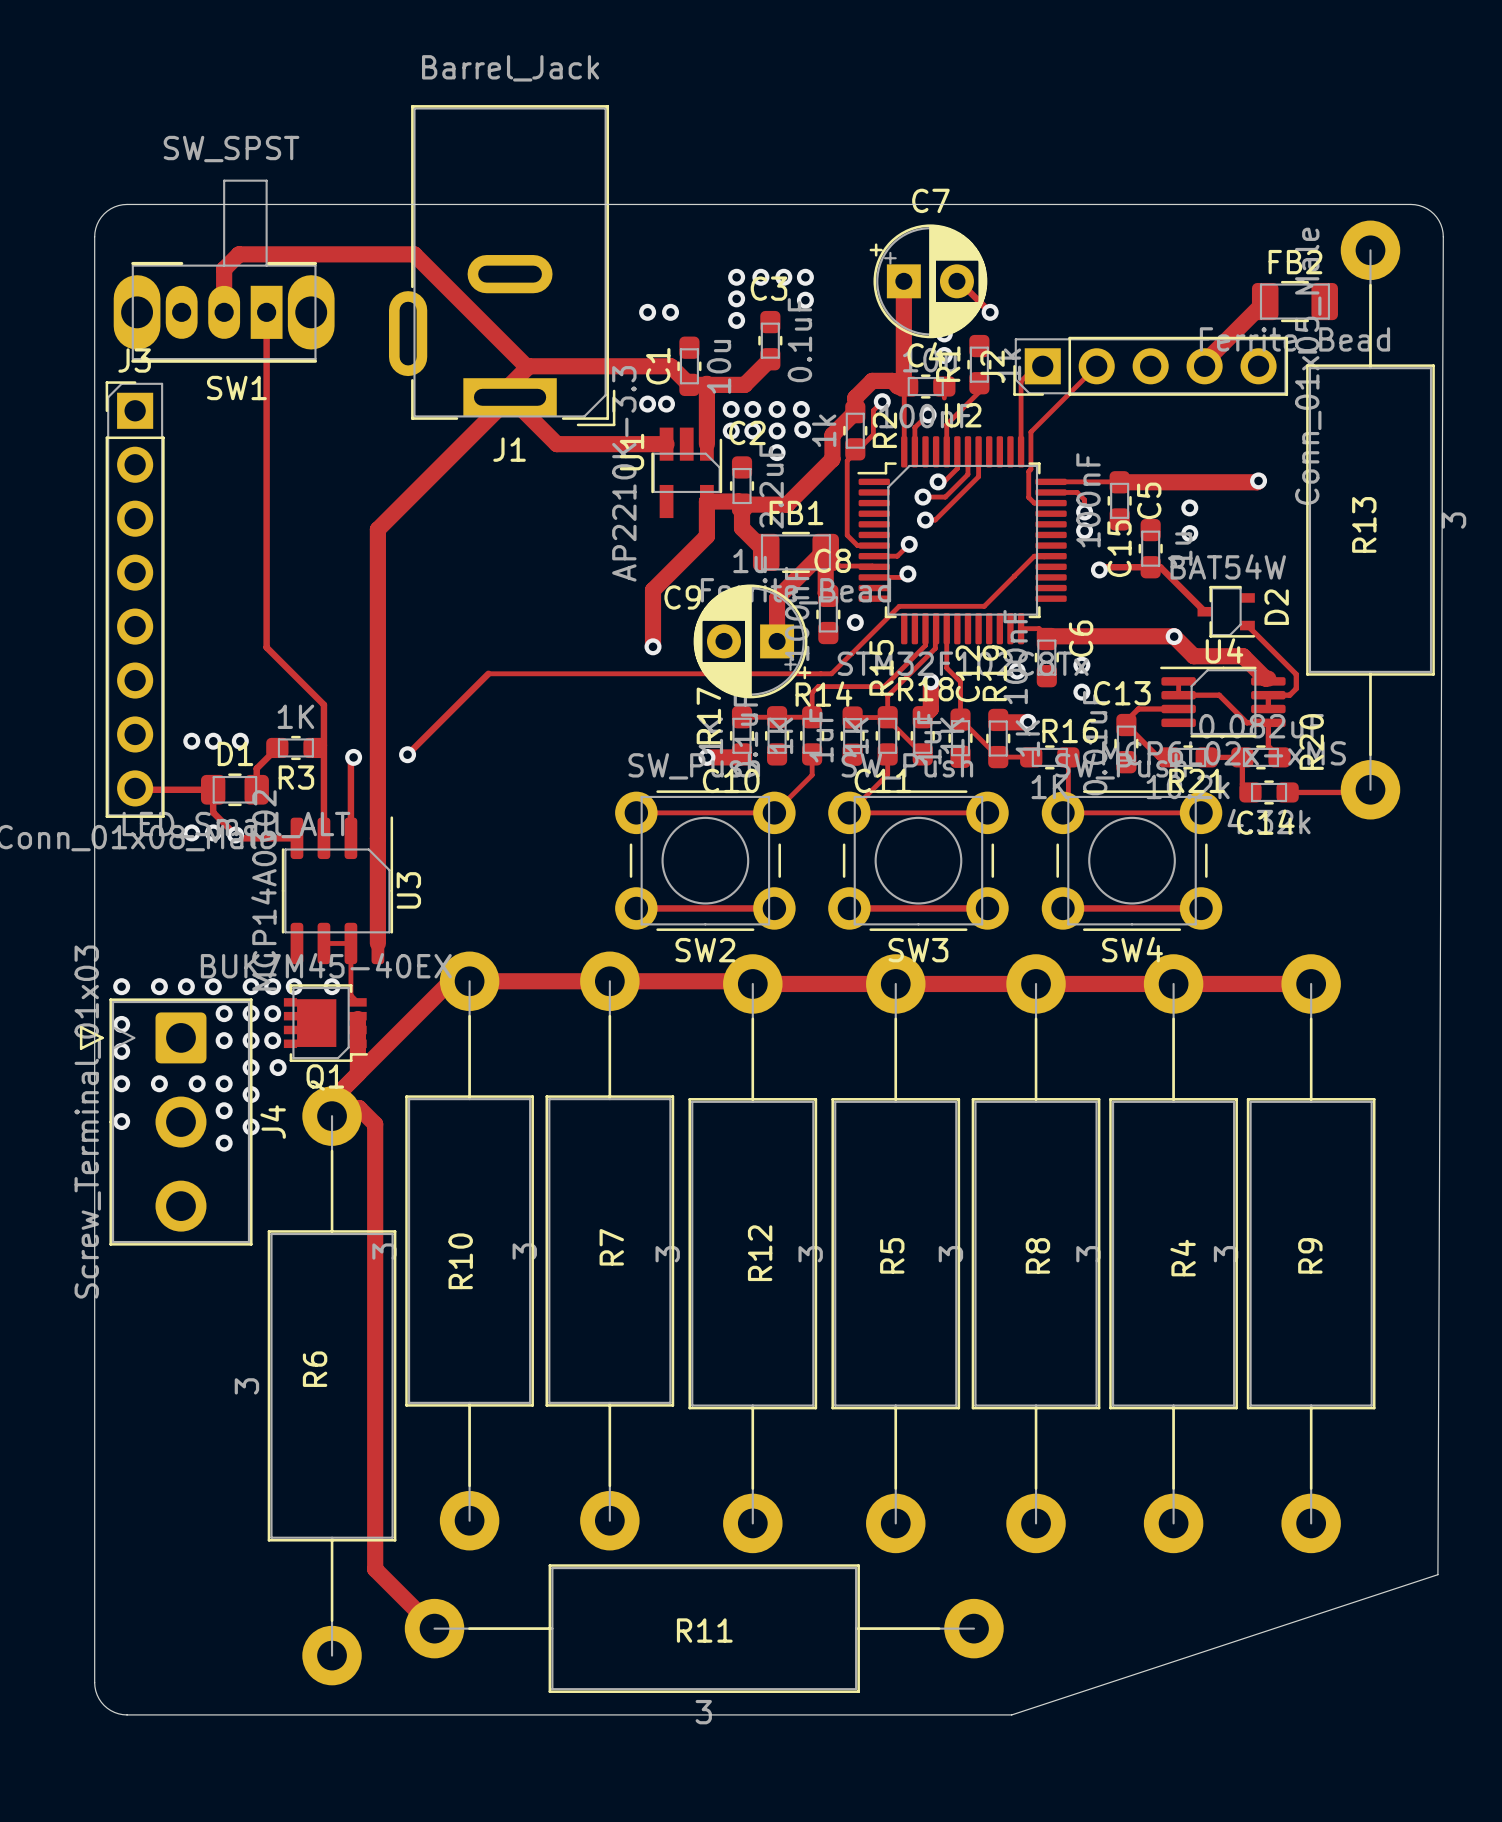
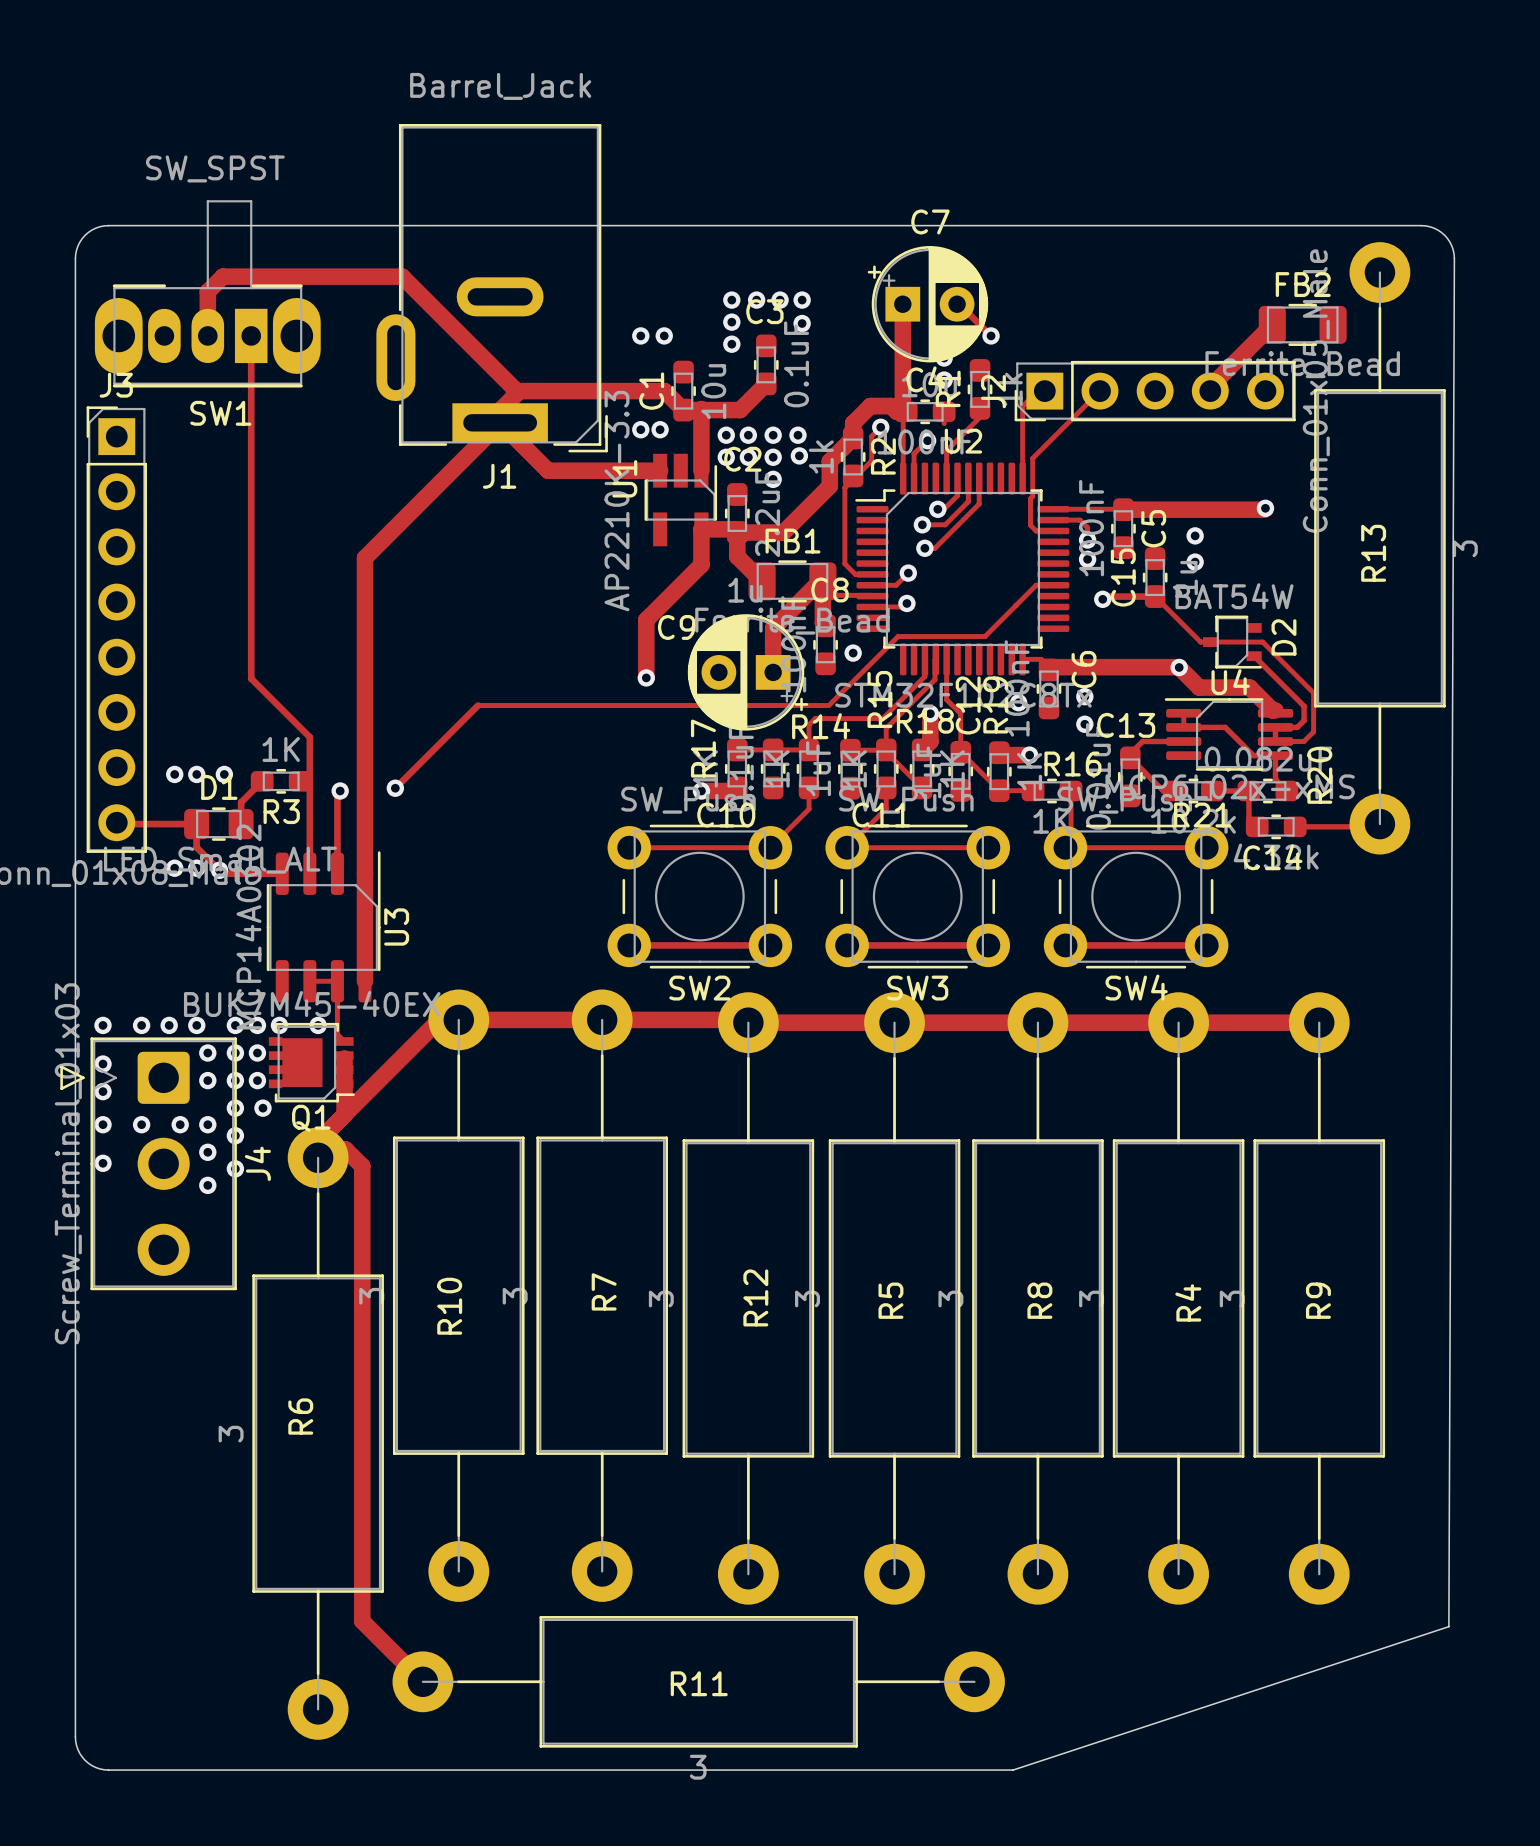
track: (1150, 567) (1160, 567) (1204, 611) -> (1155, 596) (1200, 642) (1262, 642) (1313, 692) (1313, 731) (1303, 741) (1285, 741) (1285, 744)

